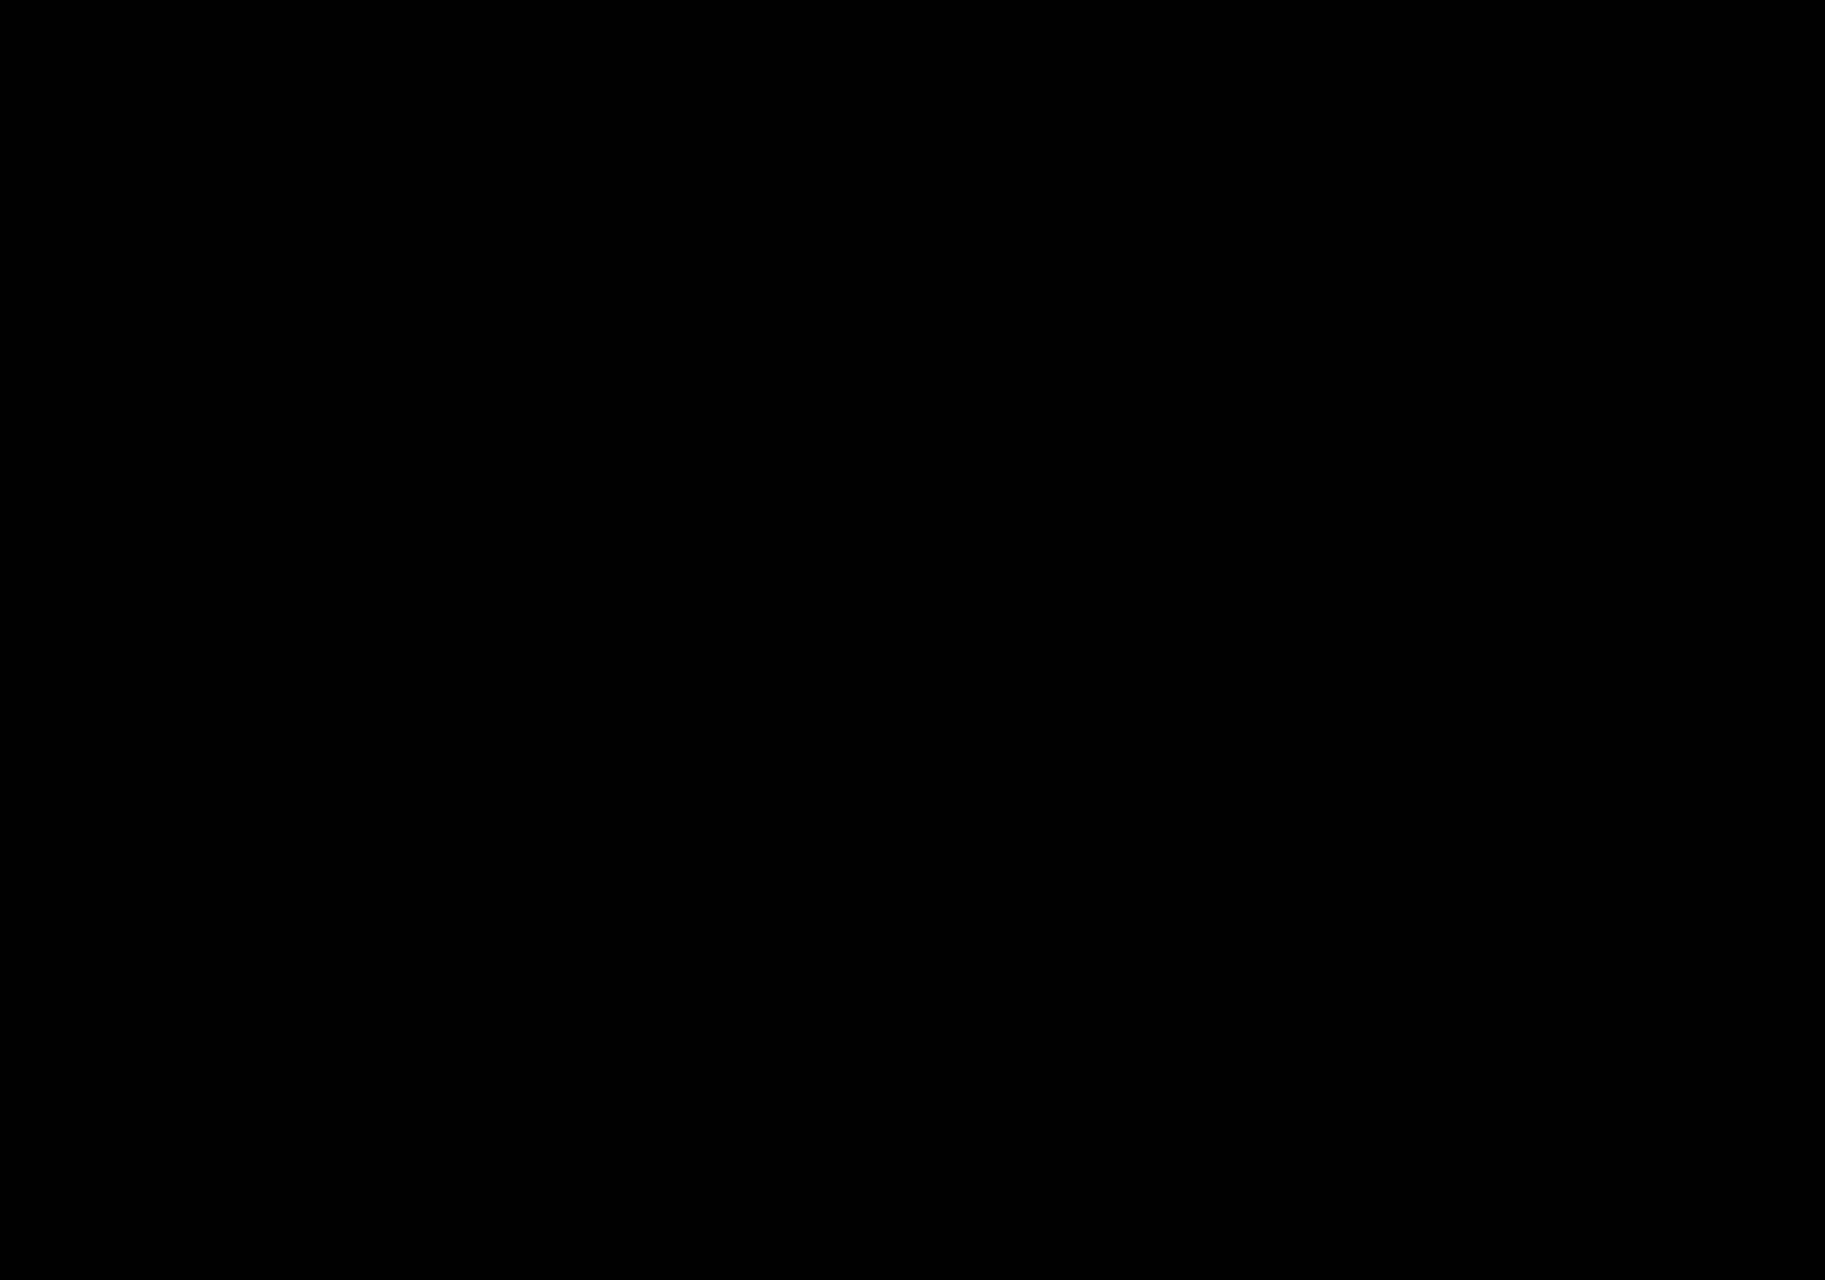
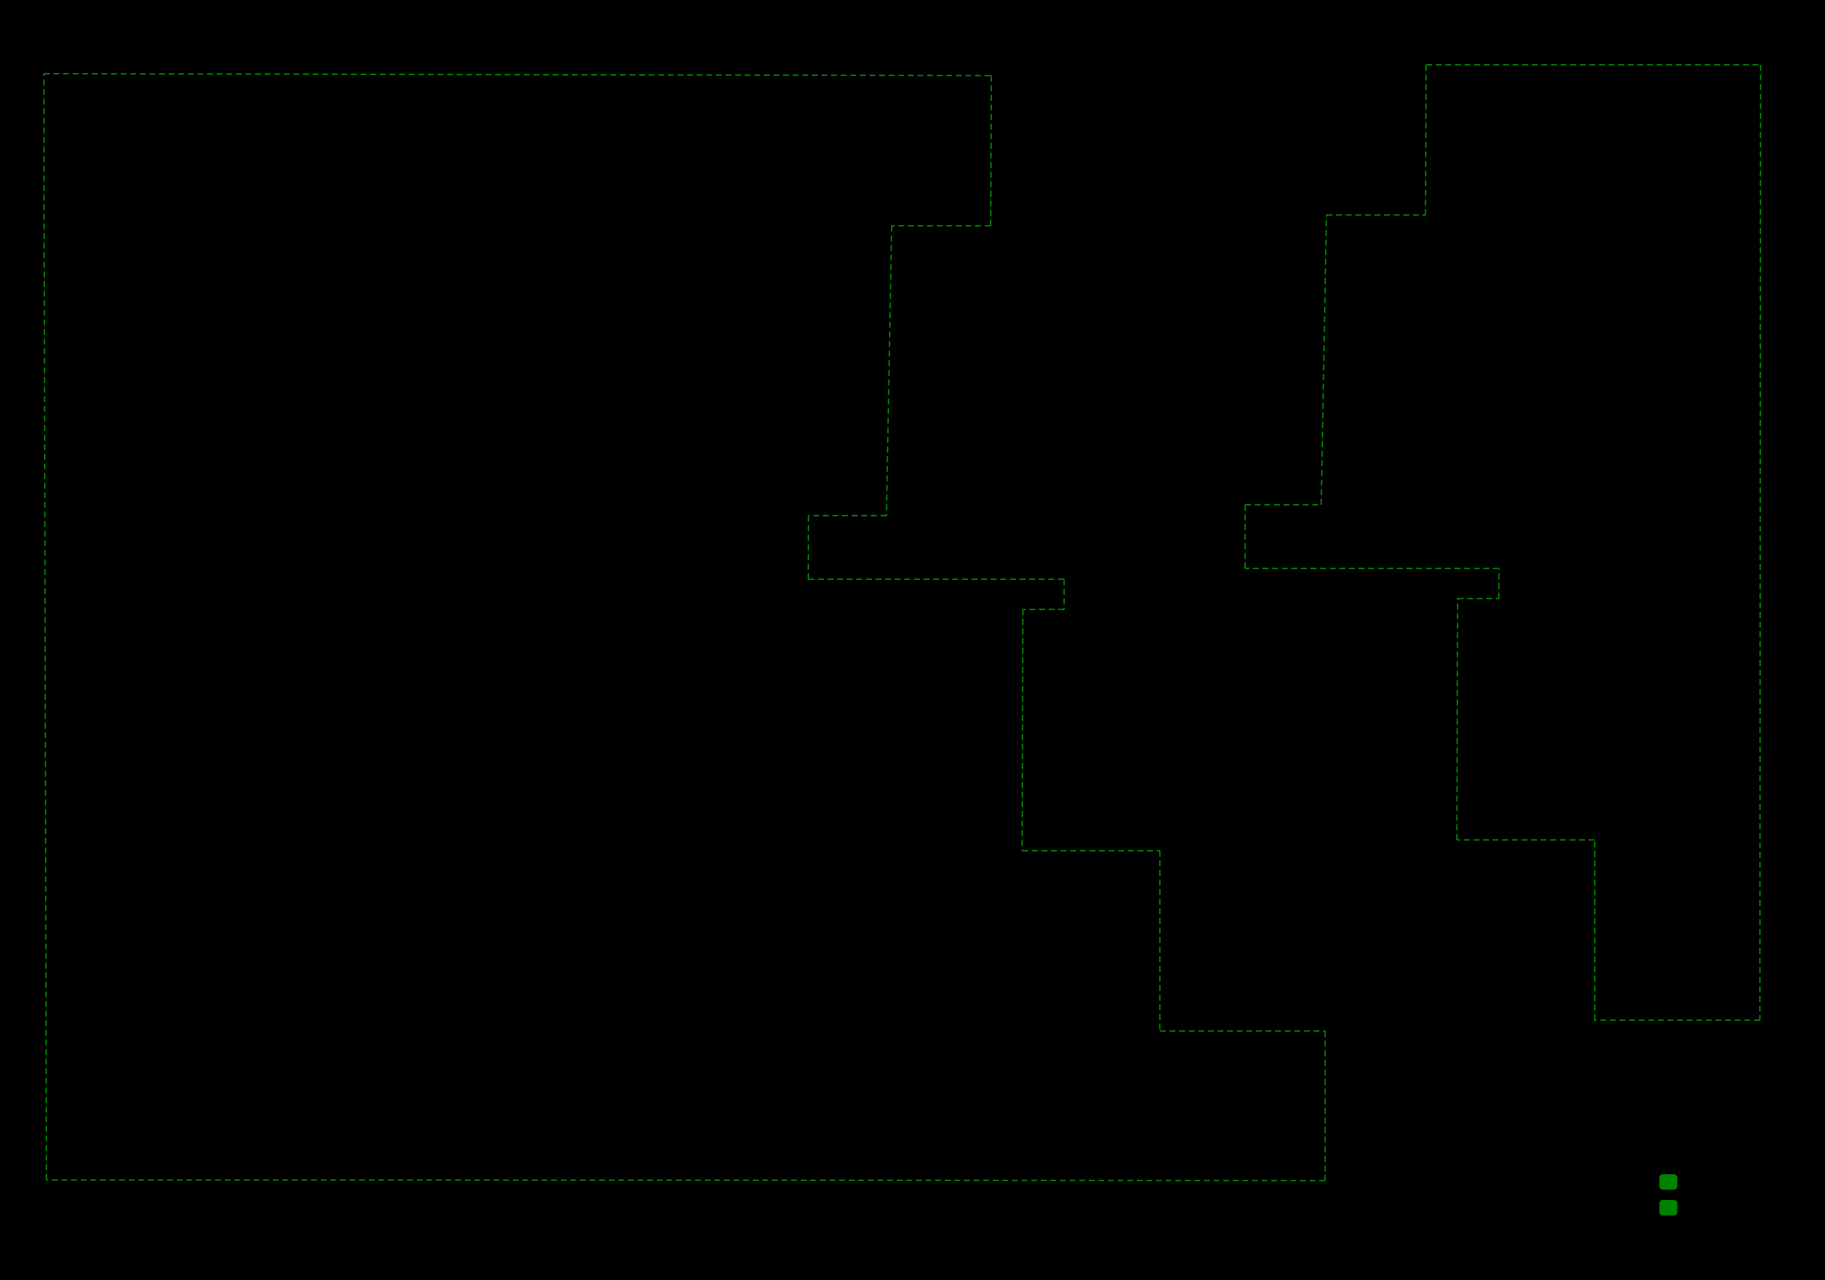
bottom zone outline: none -> (1426, 64) (1425, 214) (1326, 214) (1321, 504) (1245, 504) (1244, 568) (1498, 568) (1498, 598) (1457, 598) (1456, 839) (1594, 839) (1594, 1020) (1759, 1020) (1760, 64) (1426, 64)
bottom zone outline: none -> (43, 73) (46, 1179) (1325, 1180) (1325, 1030) (1159, 1031) (1159, 850) (1022, 850) (1022, 609) (1064, 609) (1064, 579) (808, 579) (808, 515) (886, 515) (891, 225) (990, 225) (991, 75) (43, 73)
part: none -> (1668, 1194)

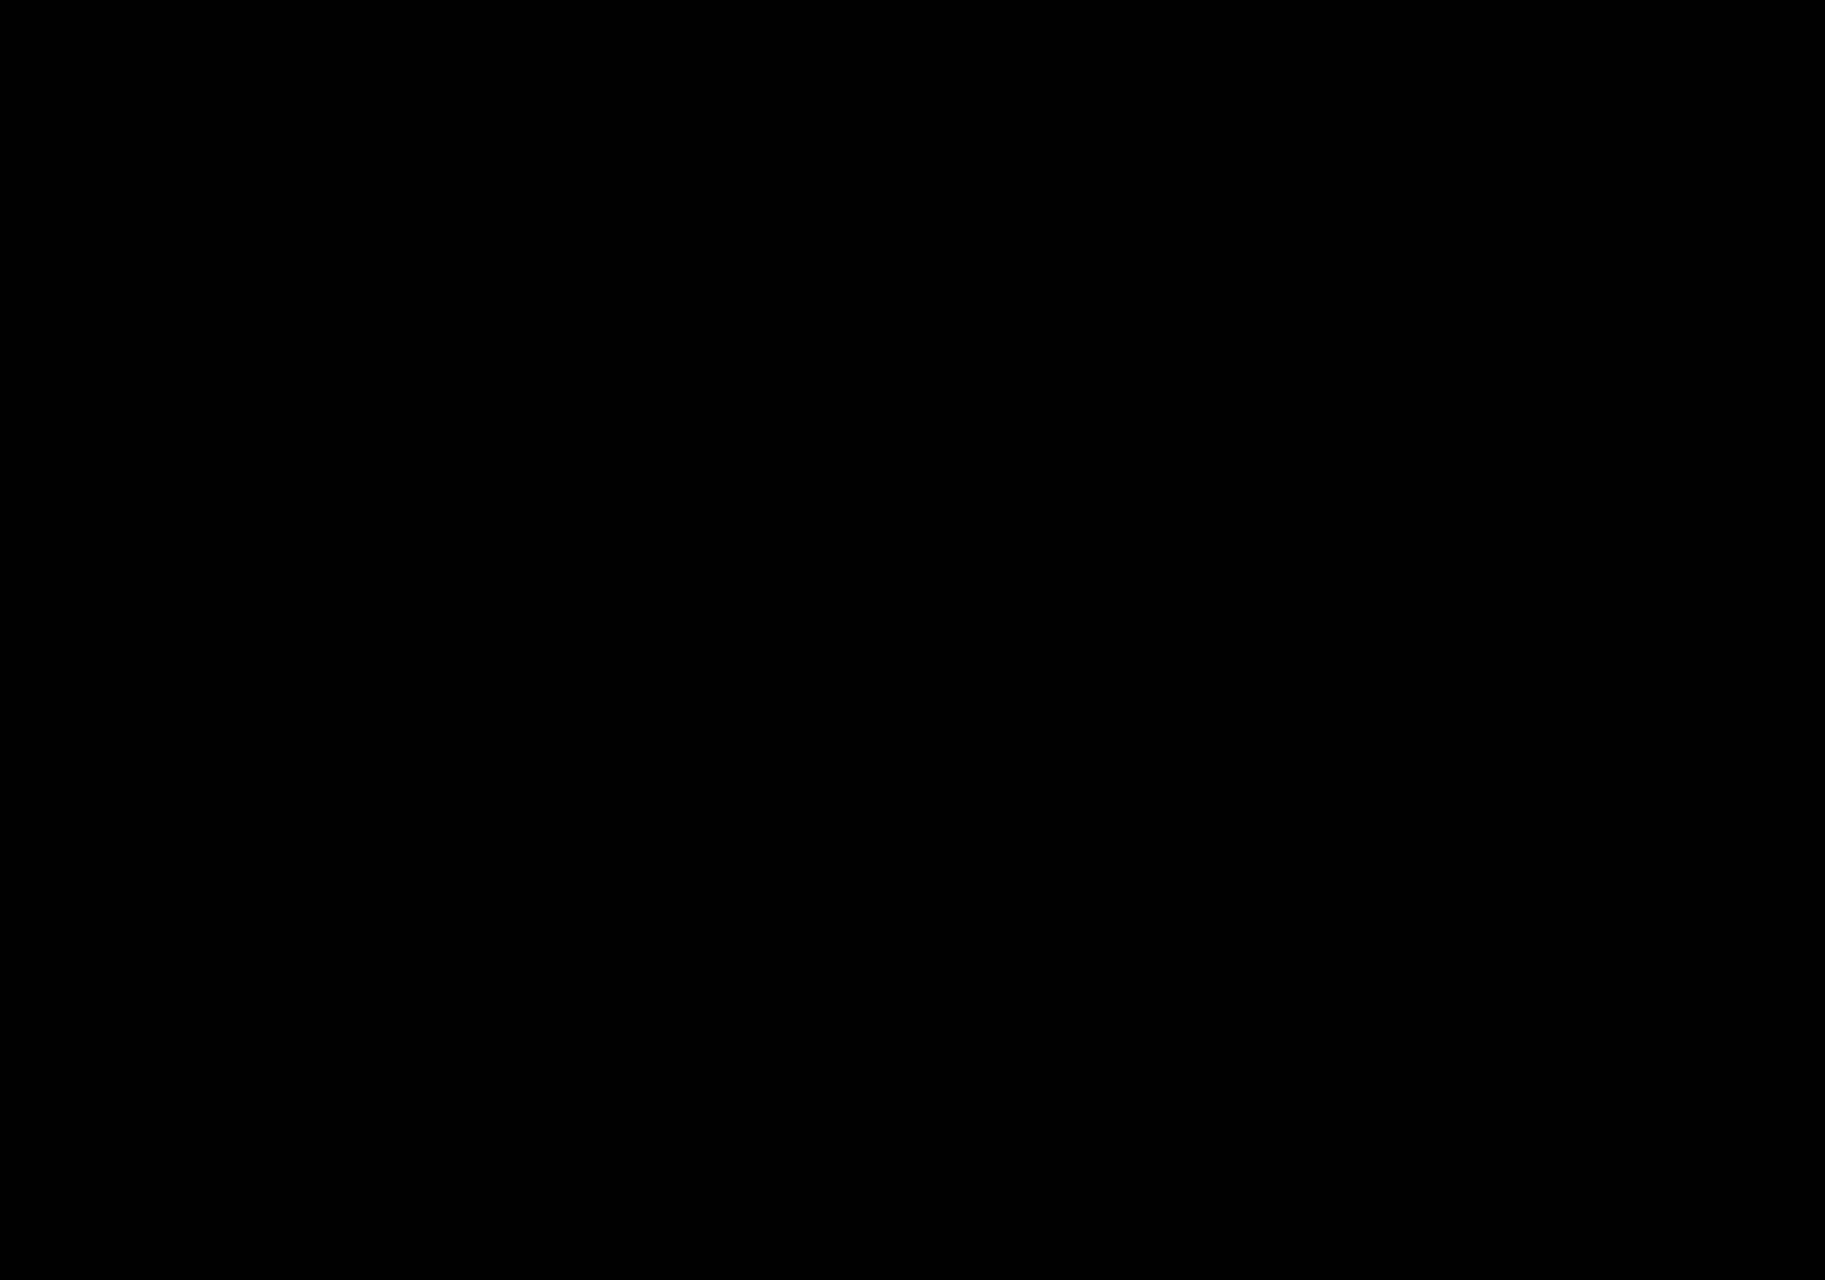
bottom zone outline: (1426, 64) (1425, 214) (1326, 214) (1321, 504) (1245, 504) (1244, 568) (1498, 568) (1498, 598) (1457, 598) (1456, 839) (1594, 839) (1594, 1020) (1759, 1020) (1760, 64) (1426, 64) -> none
bottom zone outline: (43, 73) (46, 1179) (1325, 1180) (1325, 1030) (1159, 1031) (1159, 850) (1022, 850) (1022, 609) (1064, 609) (1064, 579) (808, 579) (808, 515) (886, 515) (891, 225) (990, 225) (991, 75) (43, 73) -> none
part: (1668, 1194) -> none

